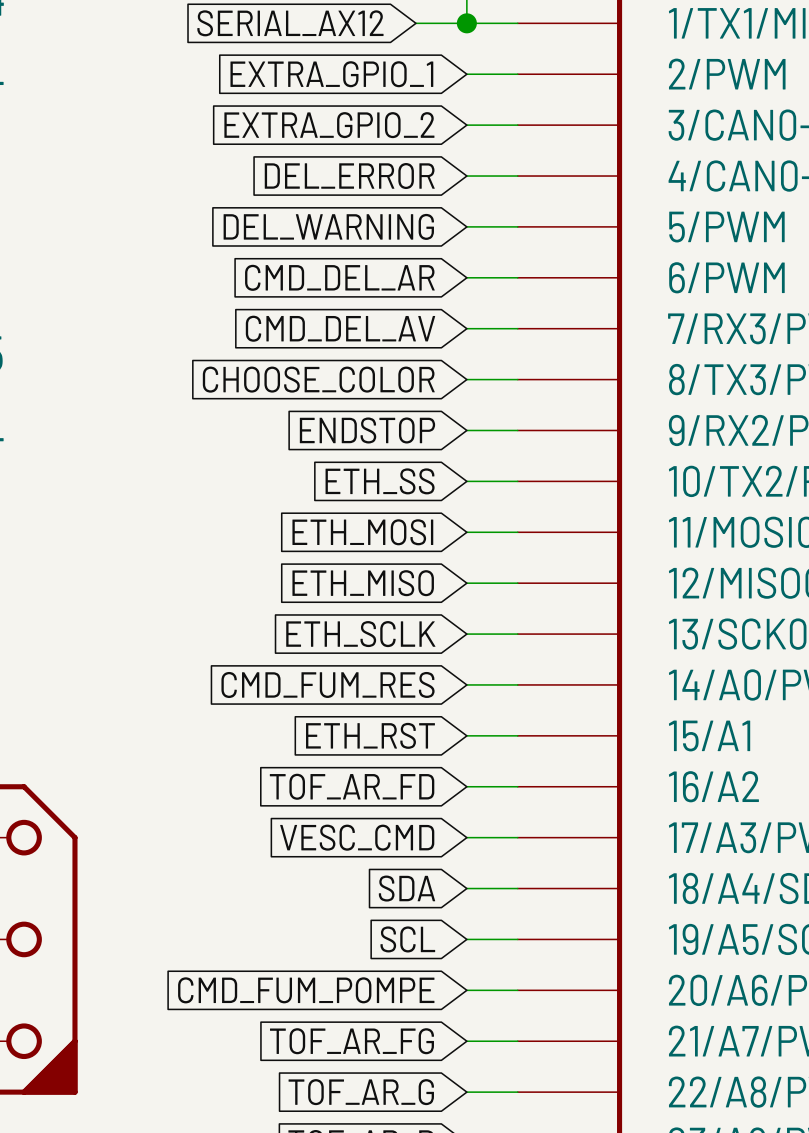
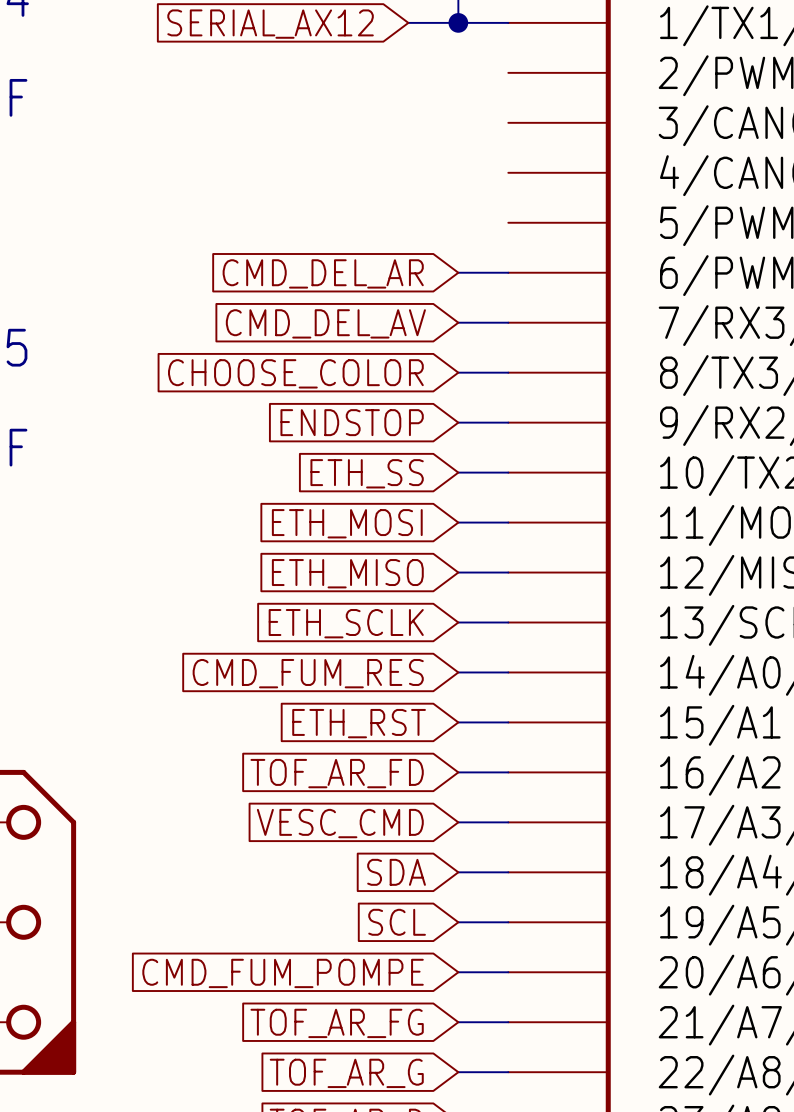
global label: EXTRA_GPIO_1 (331, 74) -> none
wire: (466, 74) (517, 74) -> none
global label: EXTRA_GPIO_2 (329, 125) -> none
wire: (466, 125) (517, 125) -> none
global label: DEL_ERROR (349, 176) -> none
wire: (466, 176) (517, 176) -> none
global label: DEL_WARNING (328, 226) -> none
wire: (466, 226) (517, 226) -> none

